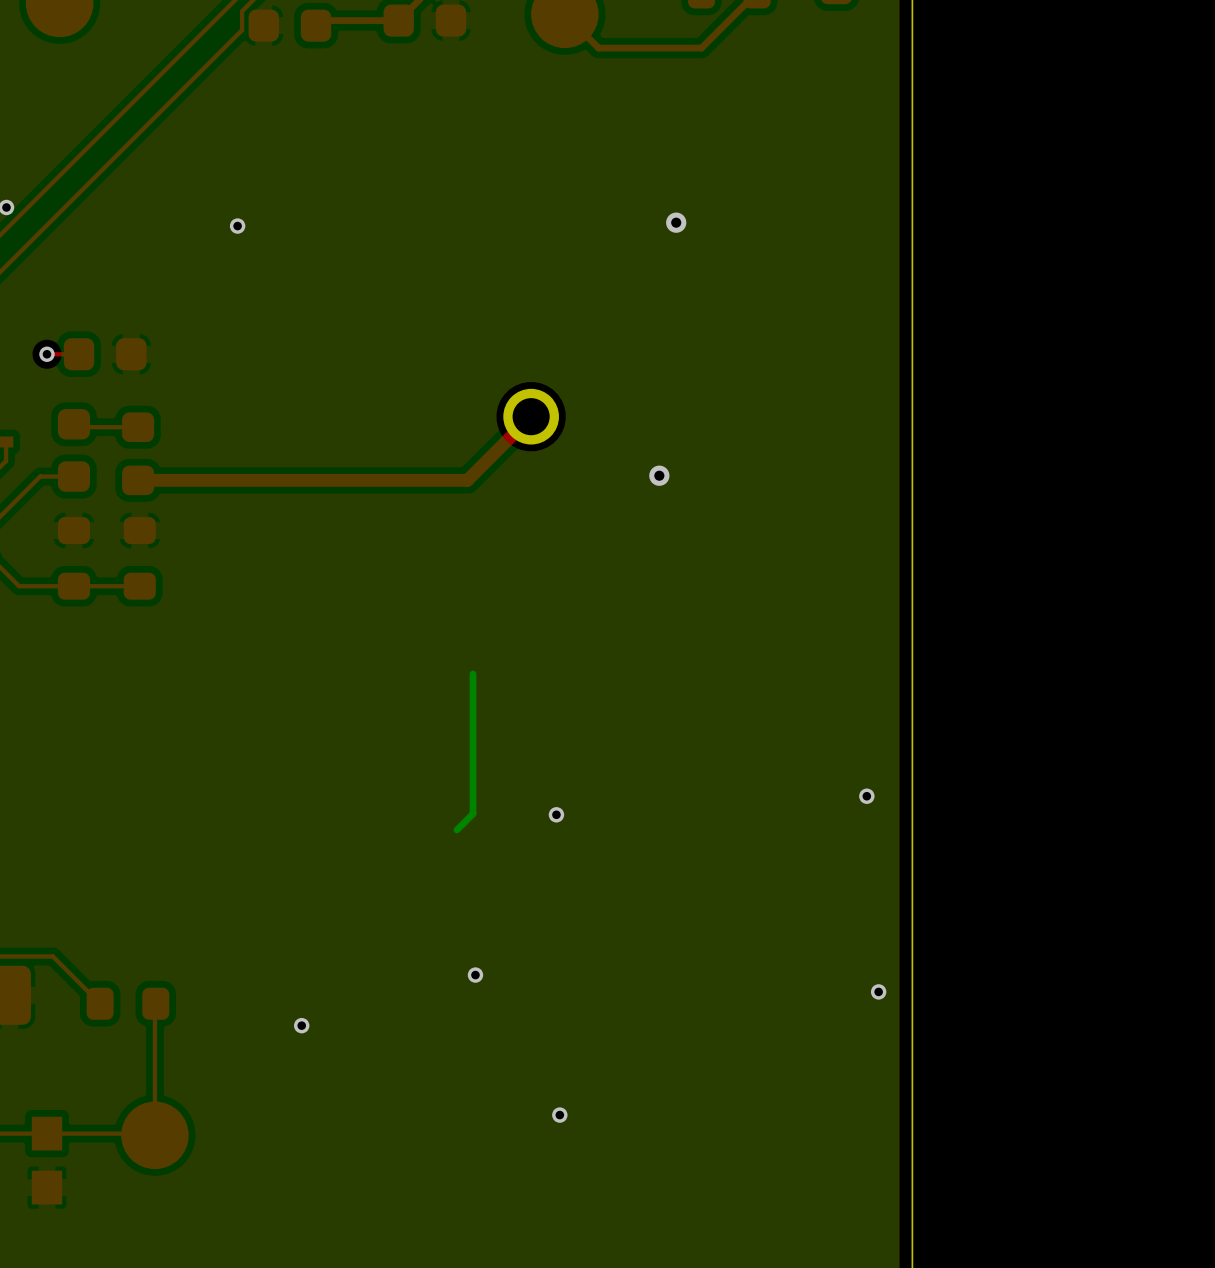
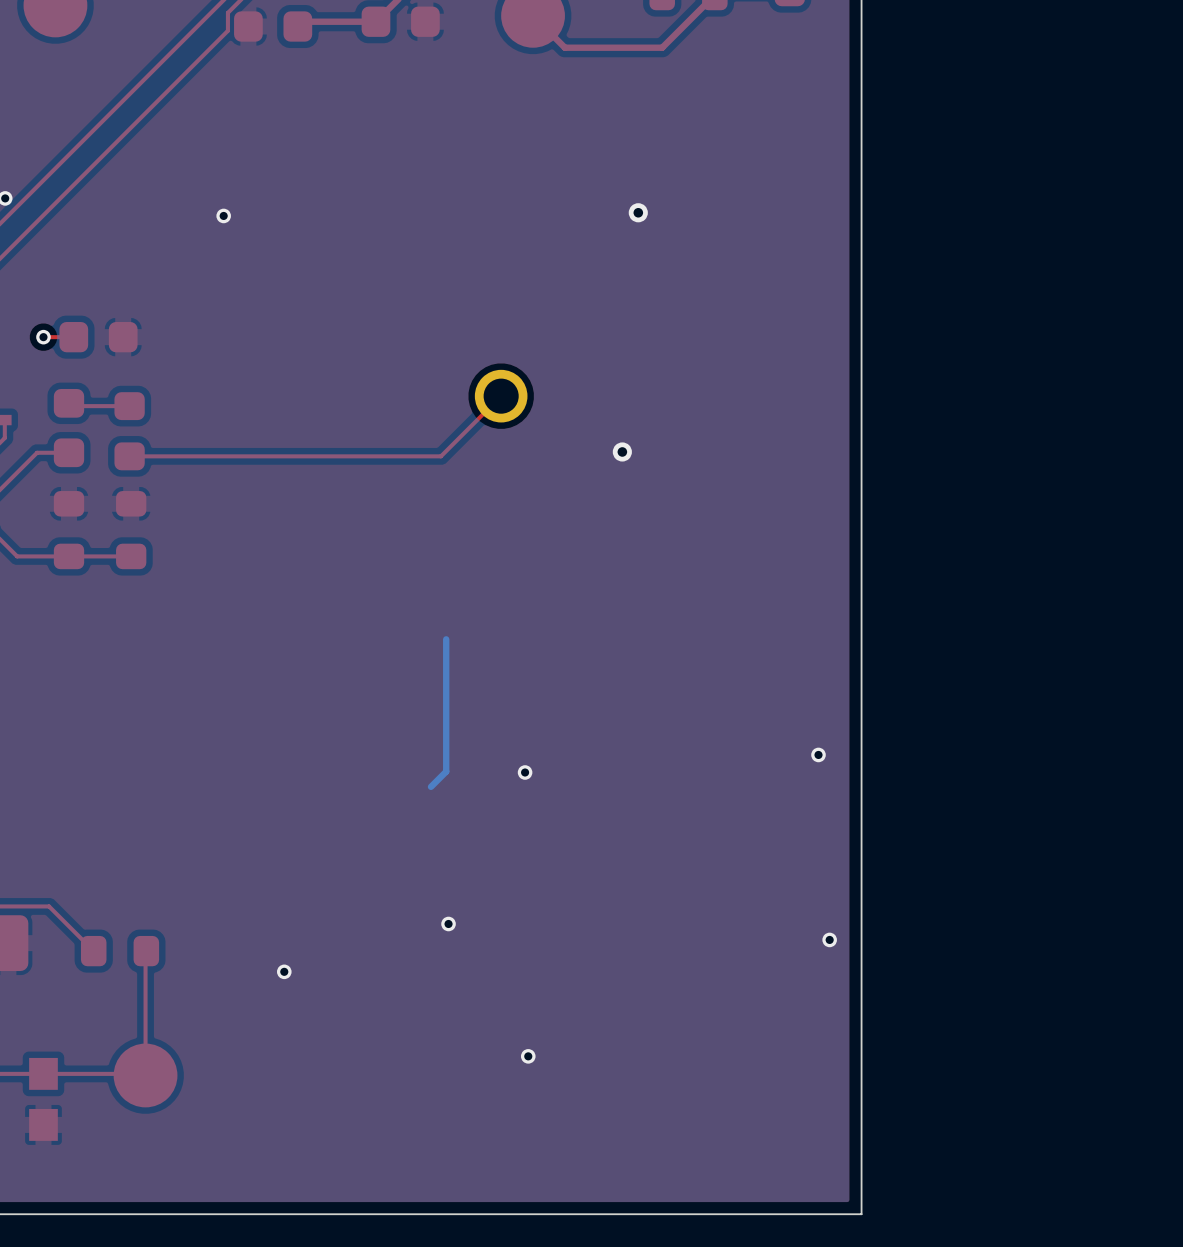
top track width: thick (531, 416) (467, 480) (138, 480) -> thin (501, 396) (440, 456) (129, 456)

